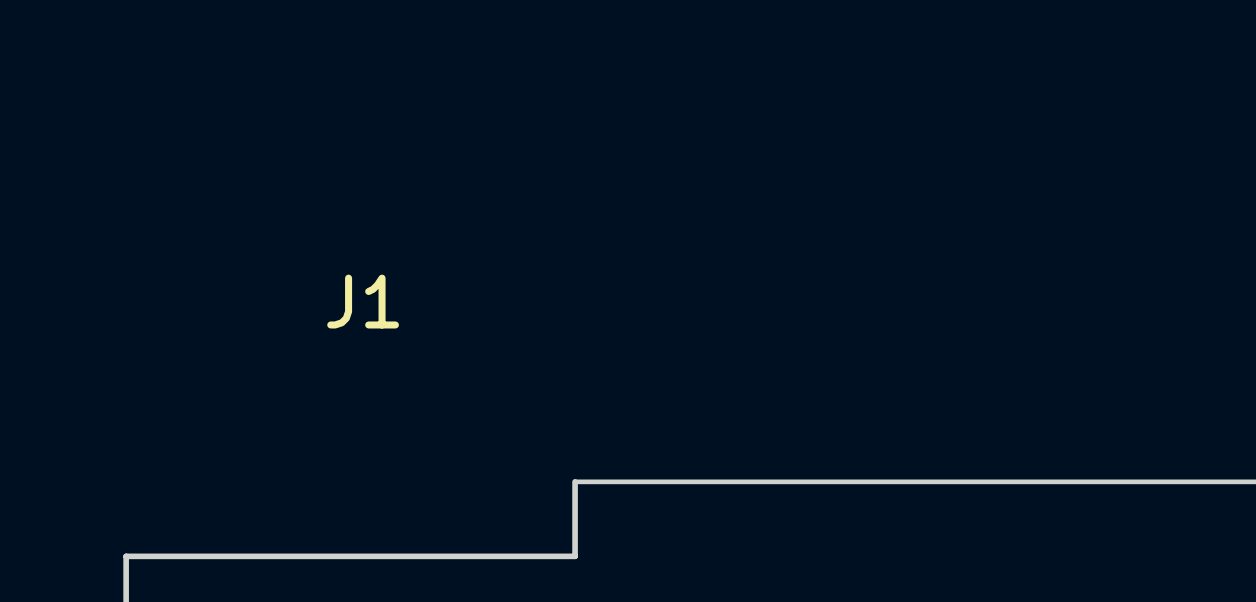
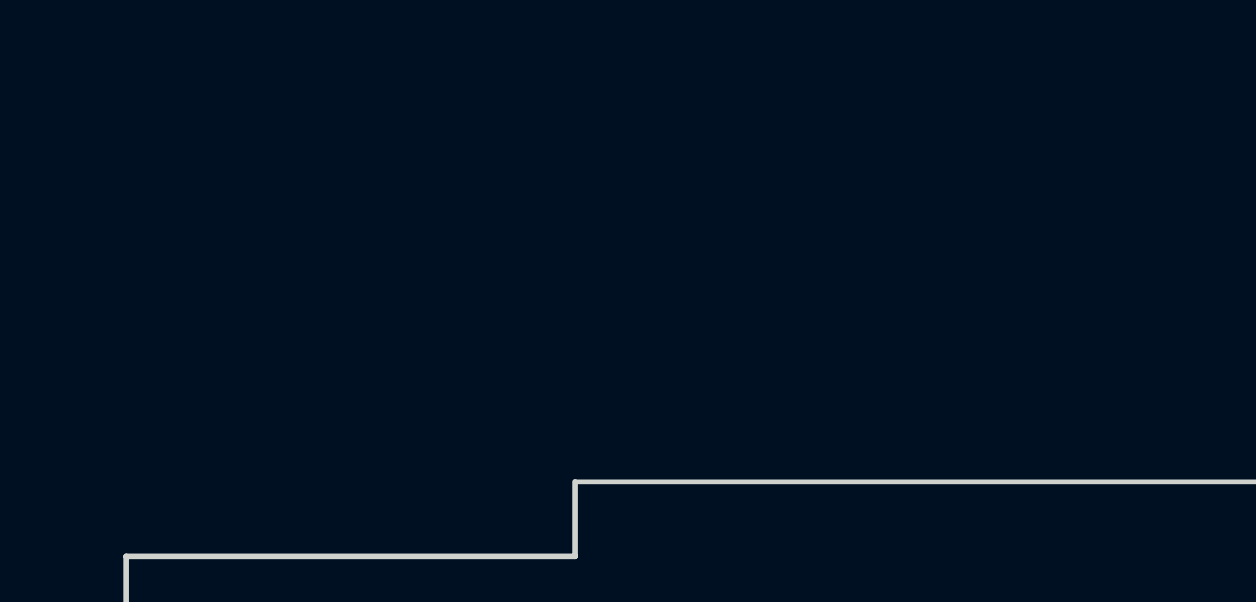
J1 name: J1 (363, 301) -> none

